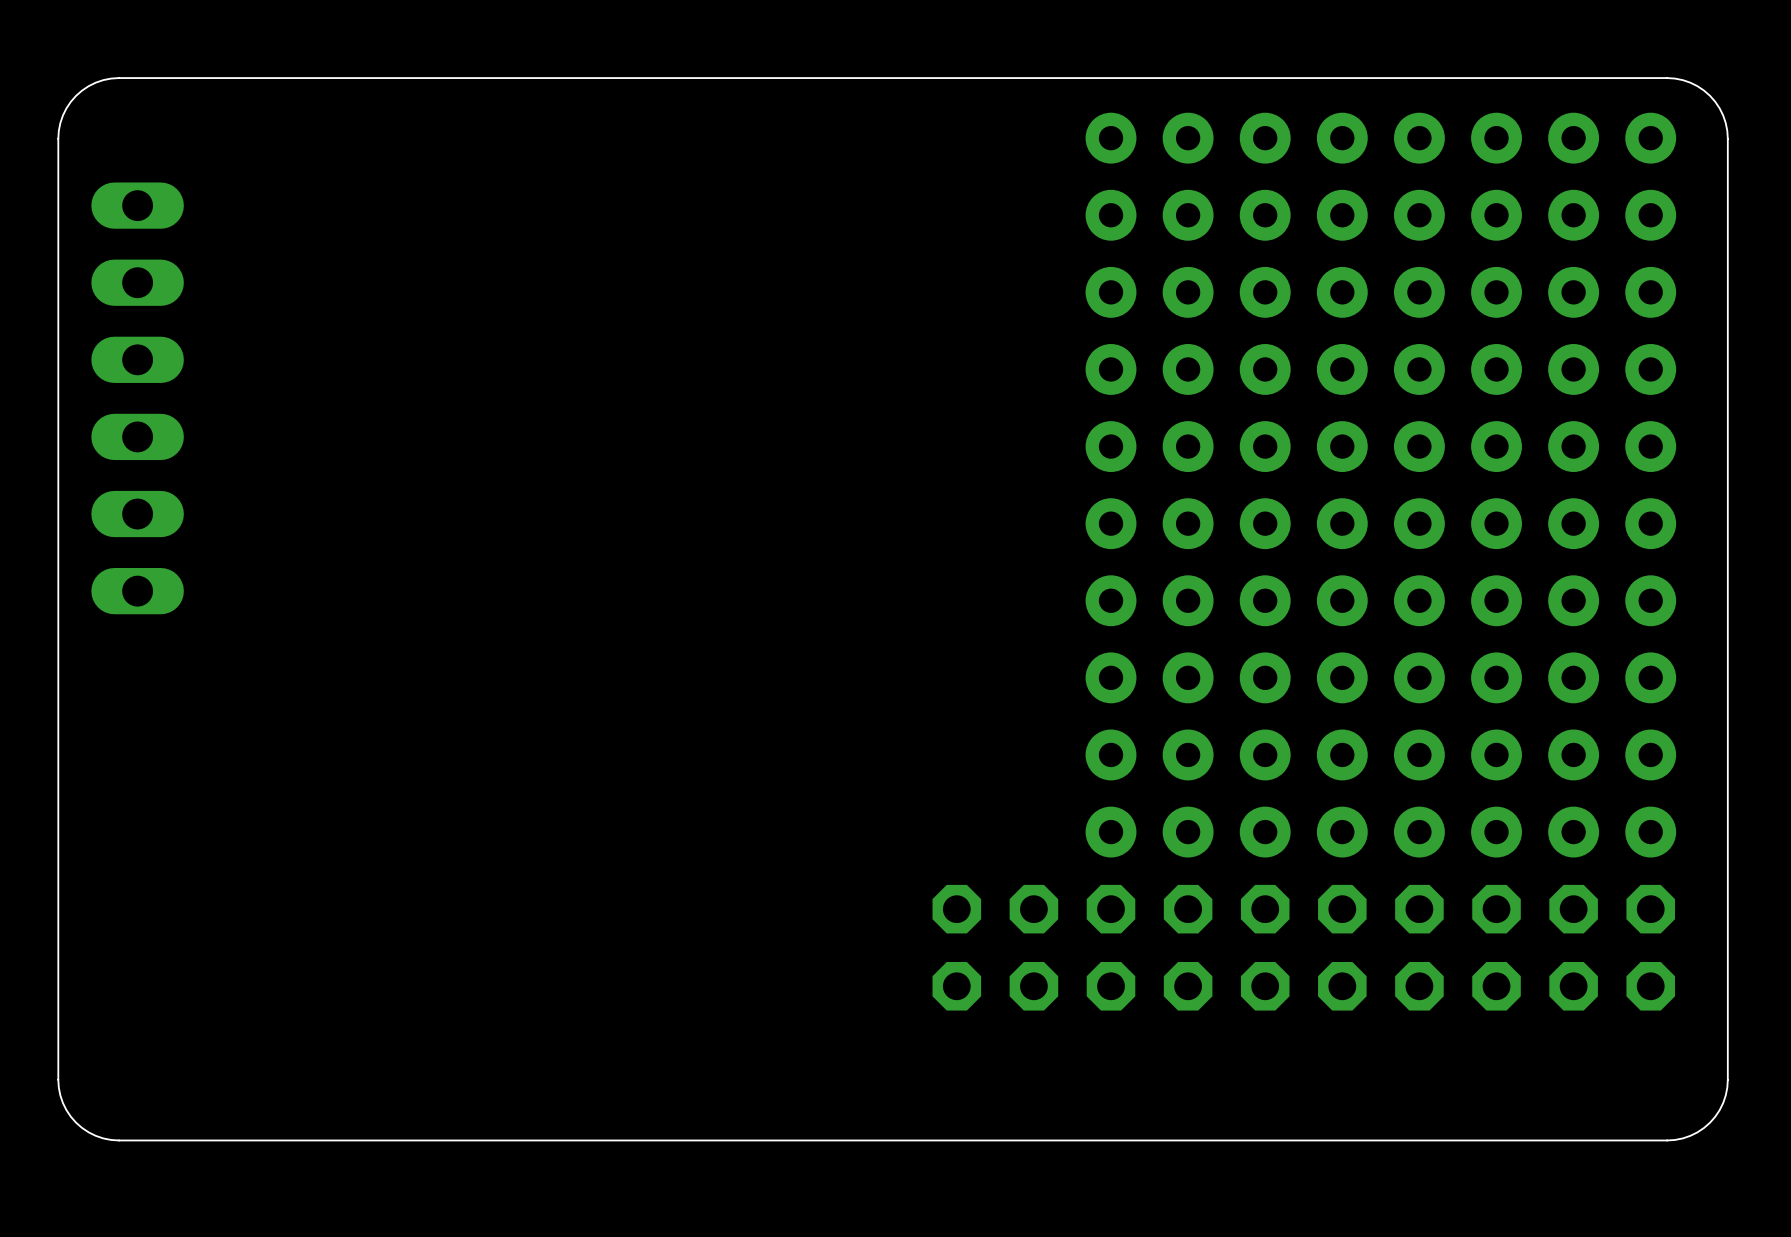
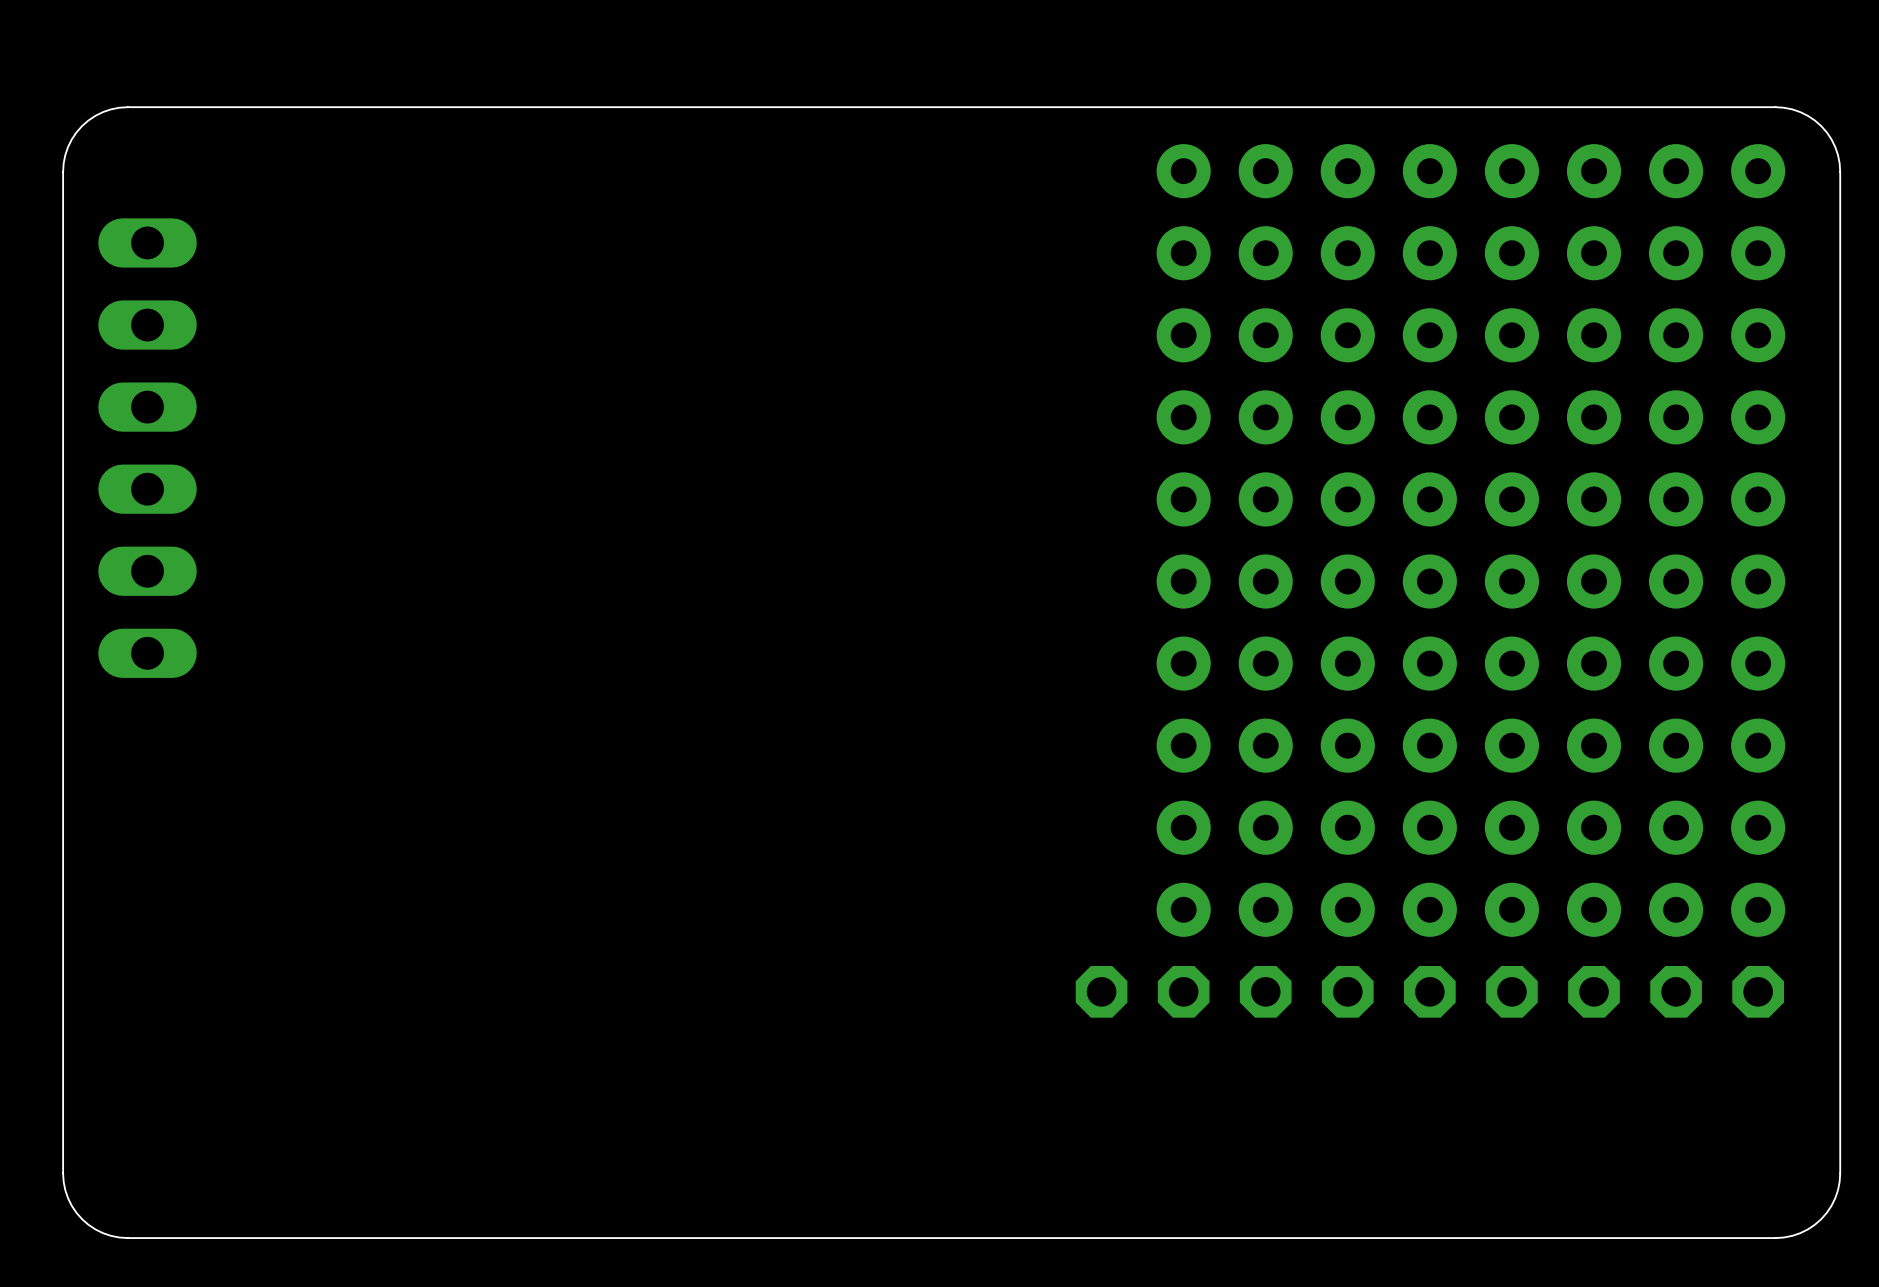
part: (956, 909) -> none
part: (956, 986) -> none
part: (1033, 986) -> none
part: (1111, 986) -> none
part: (1188, 986) -> none
part: (1265, 986) -> none
part: (1342, 986) -> none
part: (1419, 986) -> none
part: (1496, 986) -> none
part: (1573, 986) -> none
part: (1650, 986) -> none

